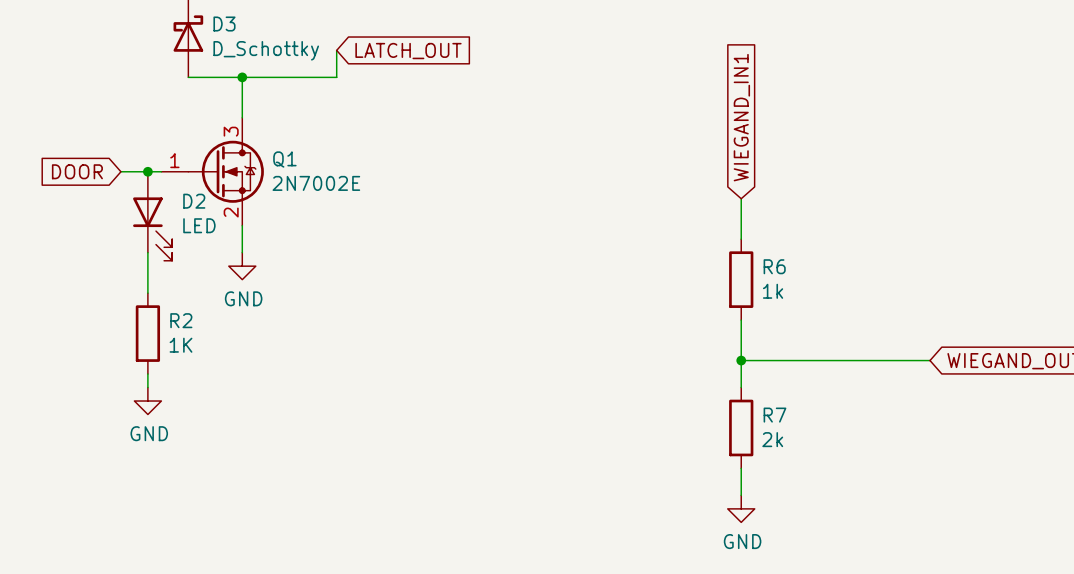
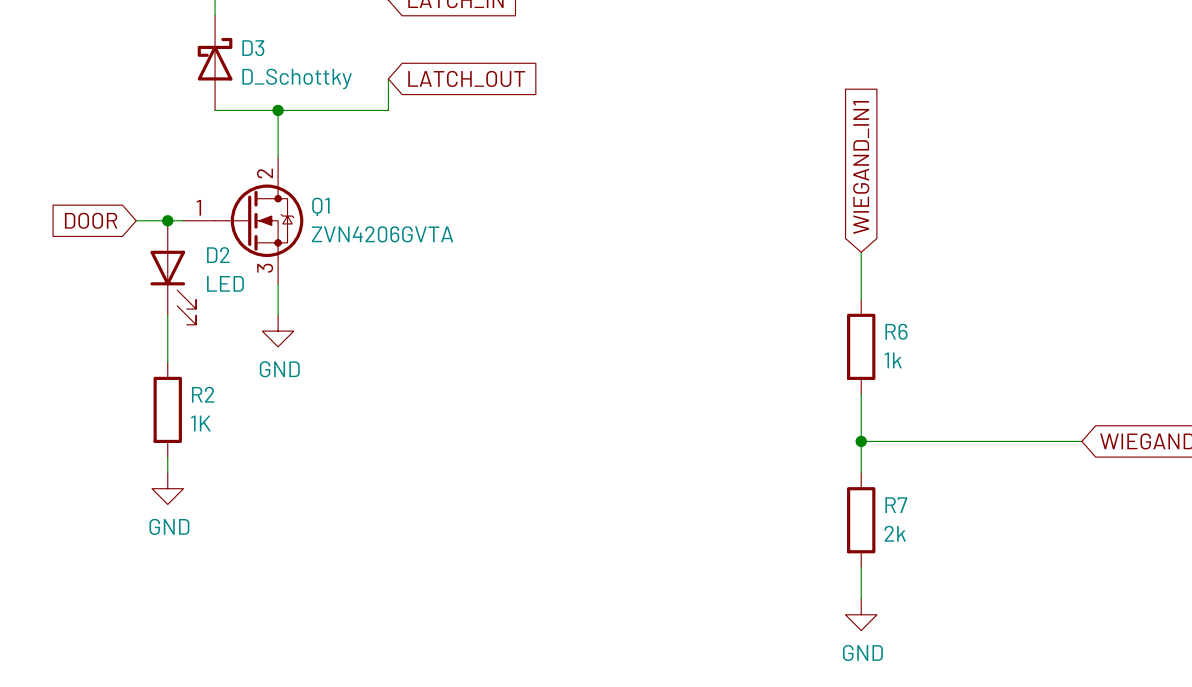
Q1 pin number: 3 (231, 131) -> 2 (264, 173)
Q1 value: 2N7002E (316, 183) -> ZVN4206GVTA (382, 234)
Q1 pin number: 2 (231, 212) -> 3 (265, 268)

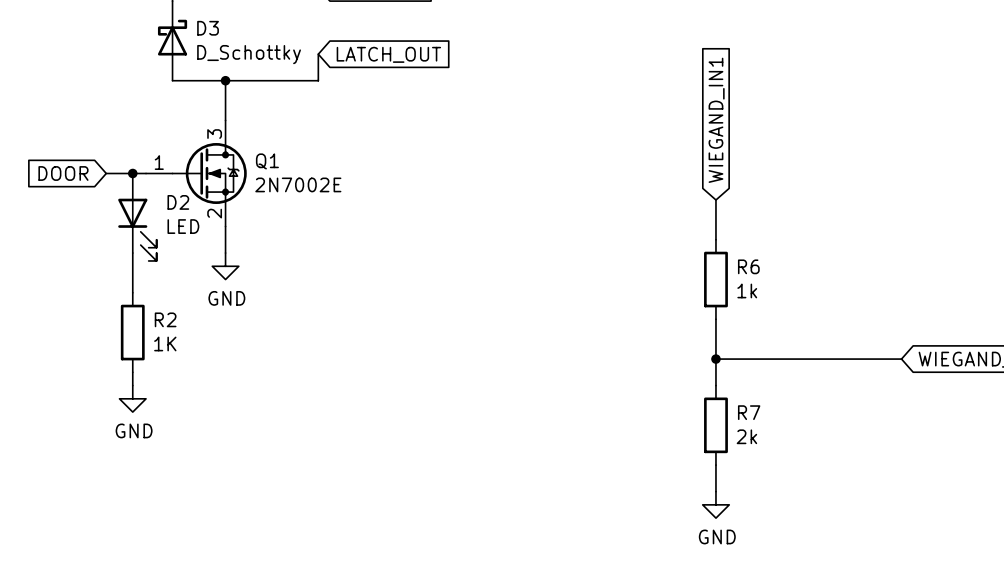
Q1 pin number: 2 (264, 173) -> 3 (214, 134)
Q1 value: ZVN4206GVTA (382, 234) -> 2N7002E (298, 184)
Q1 pin number: 3 (265, 268) -> 2 (214, 213)

